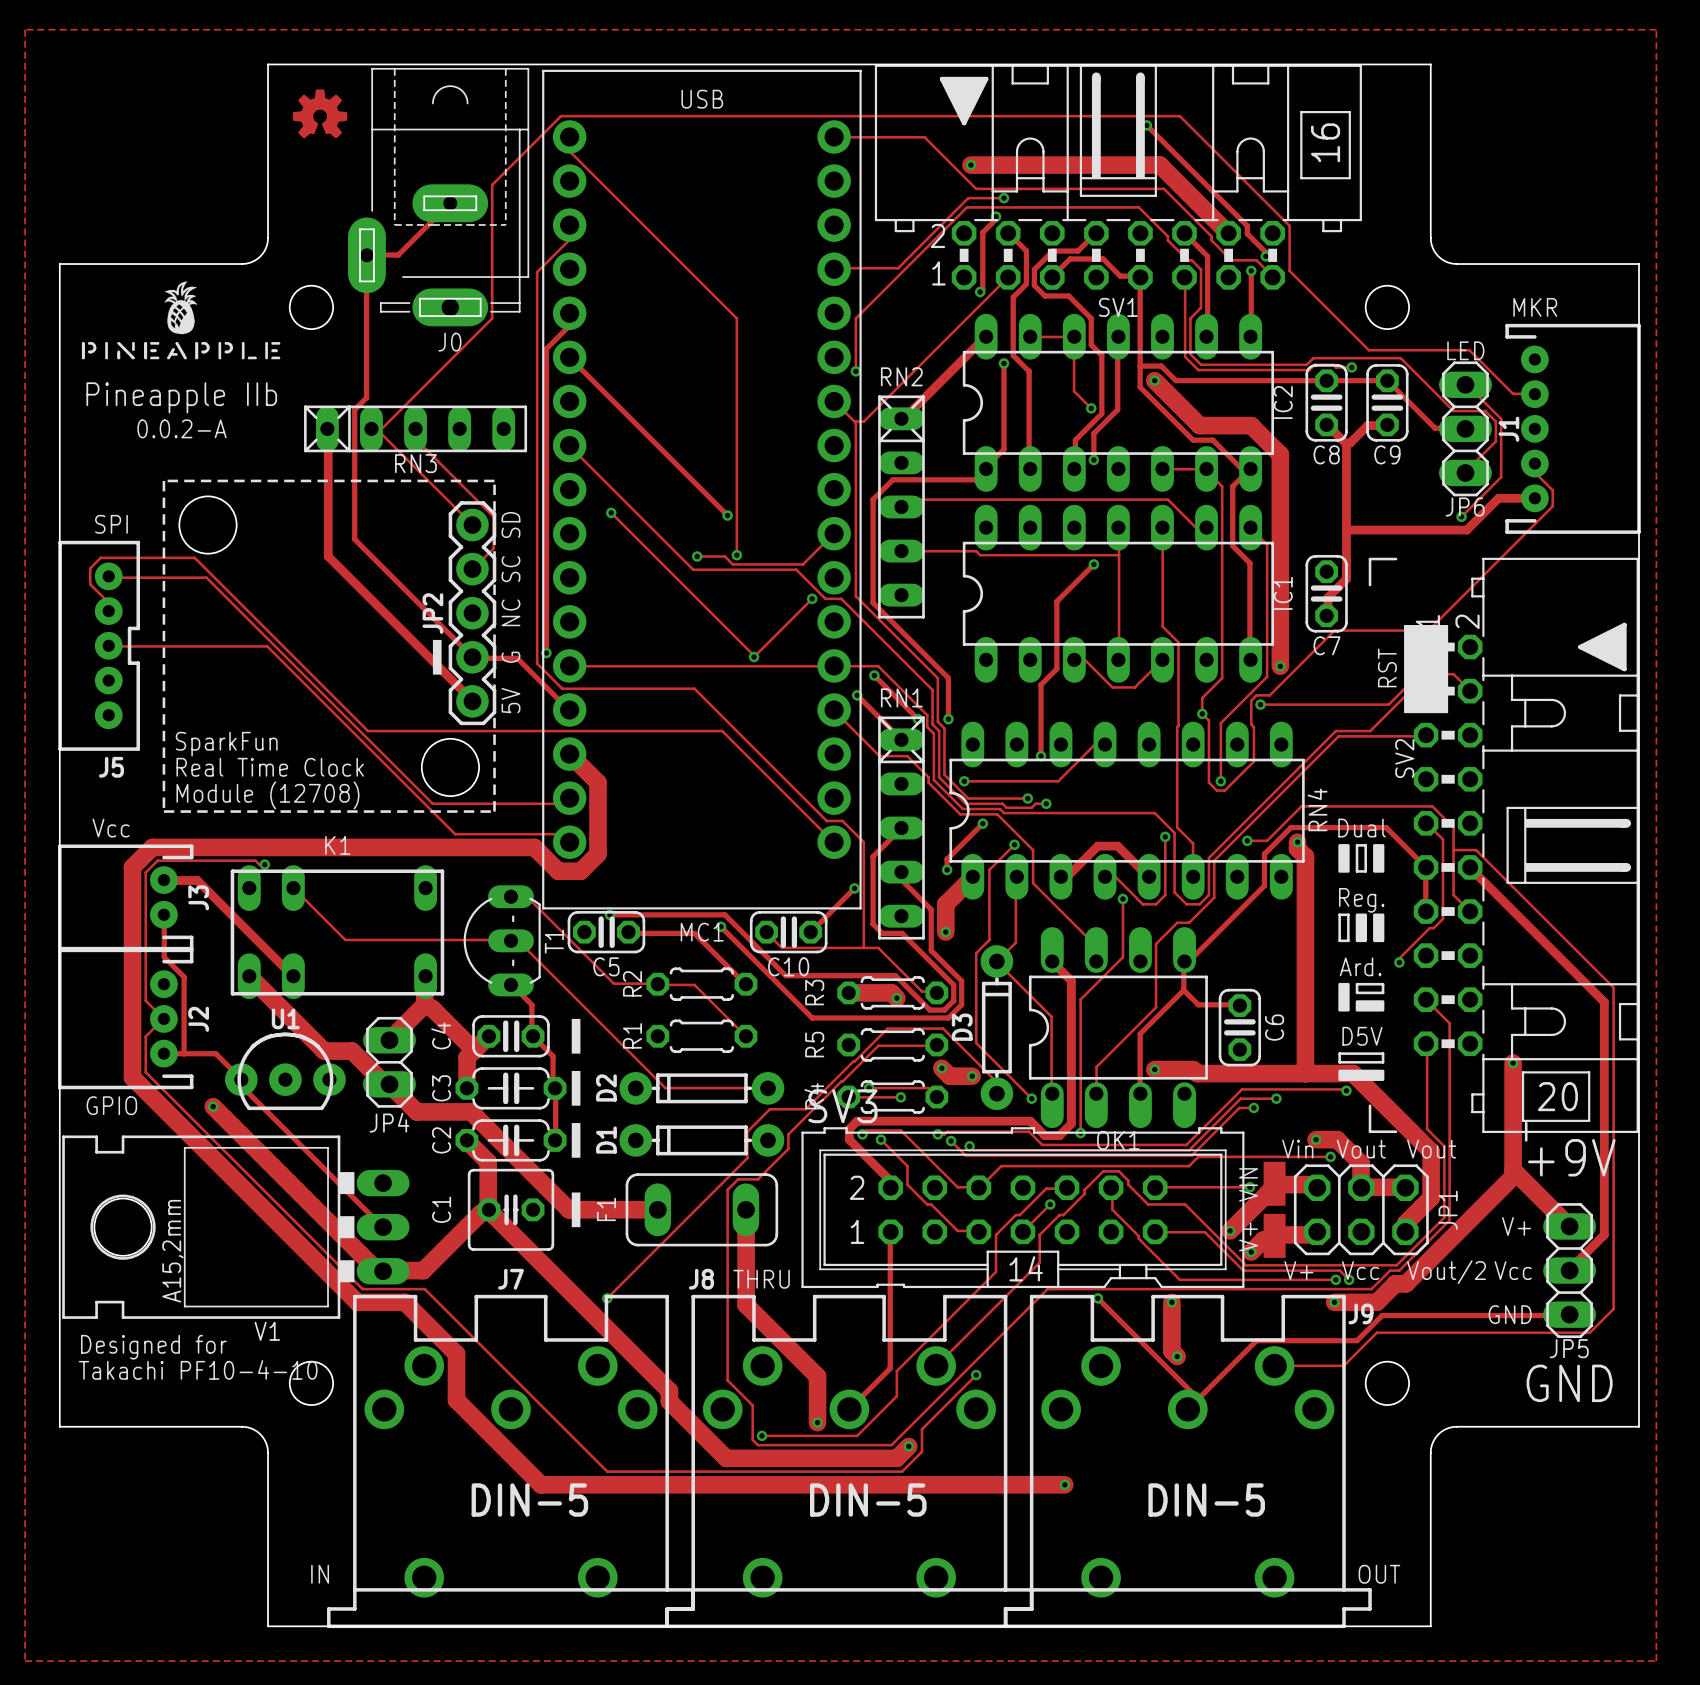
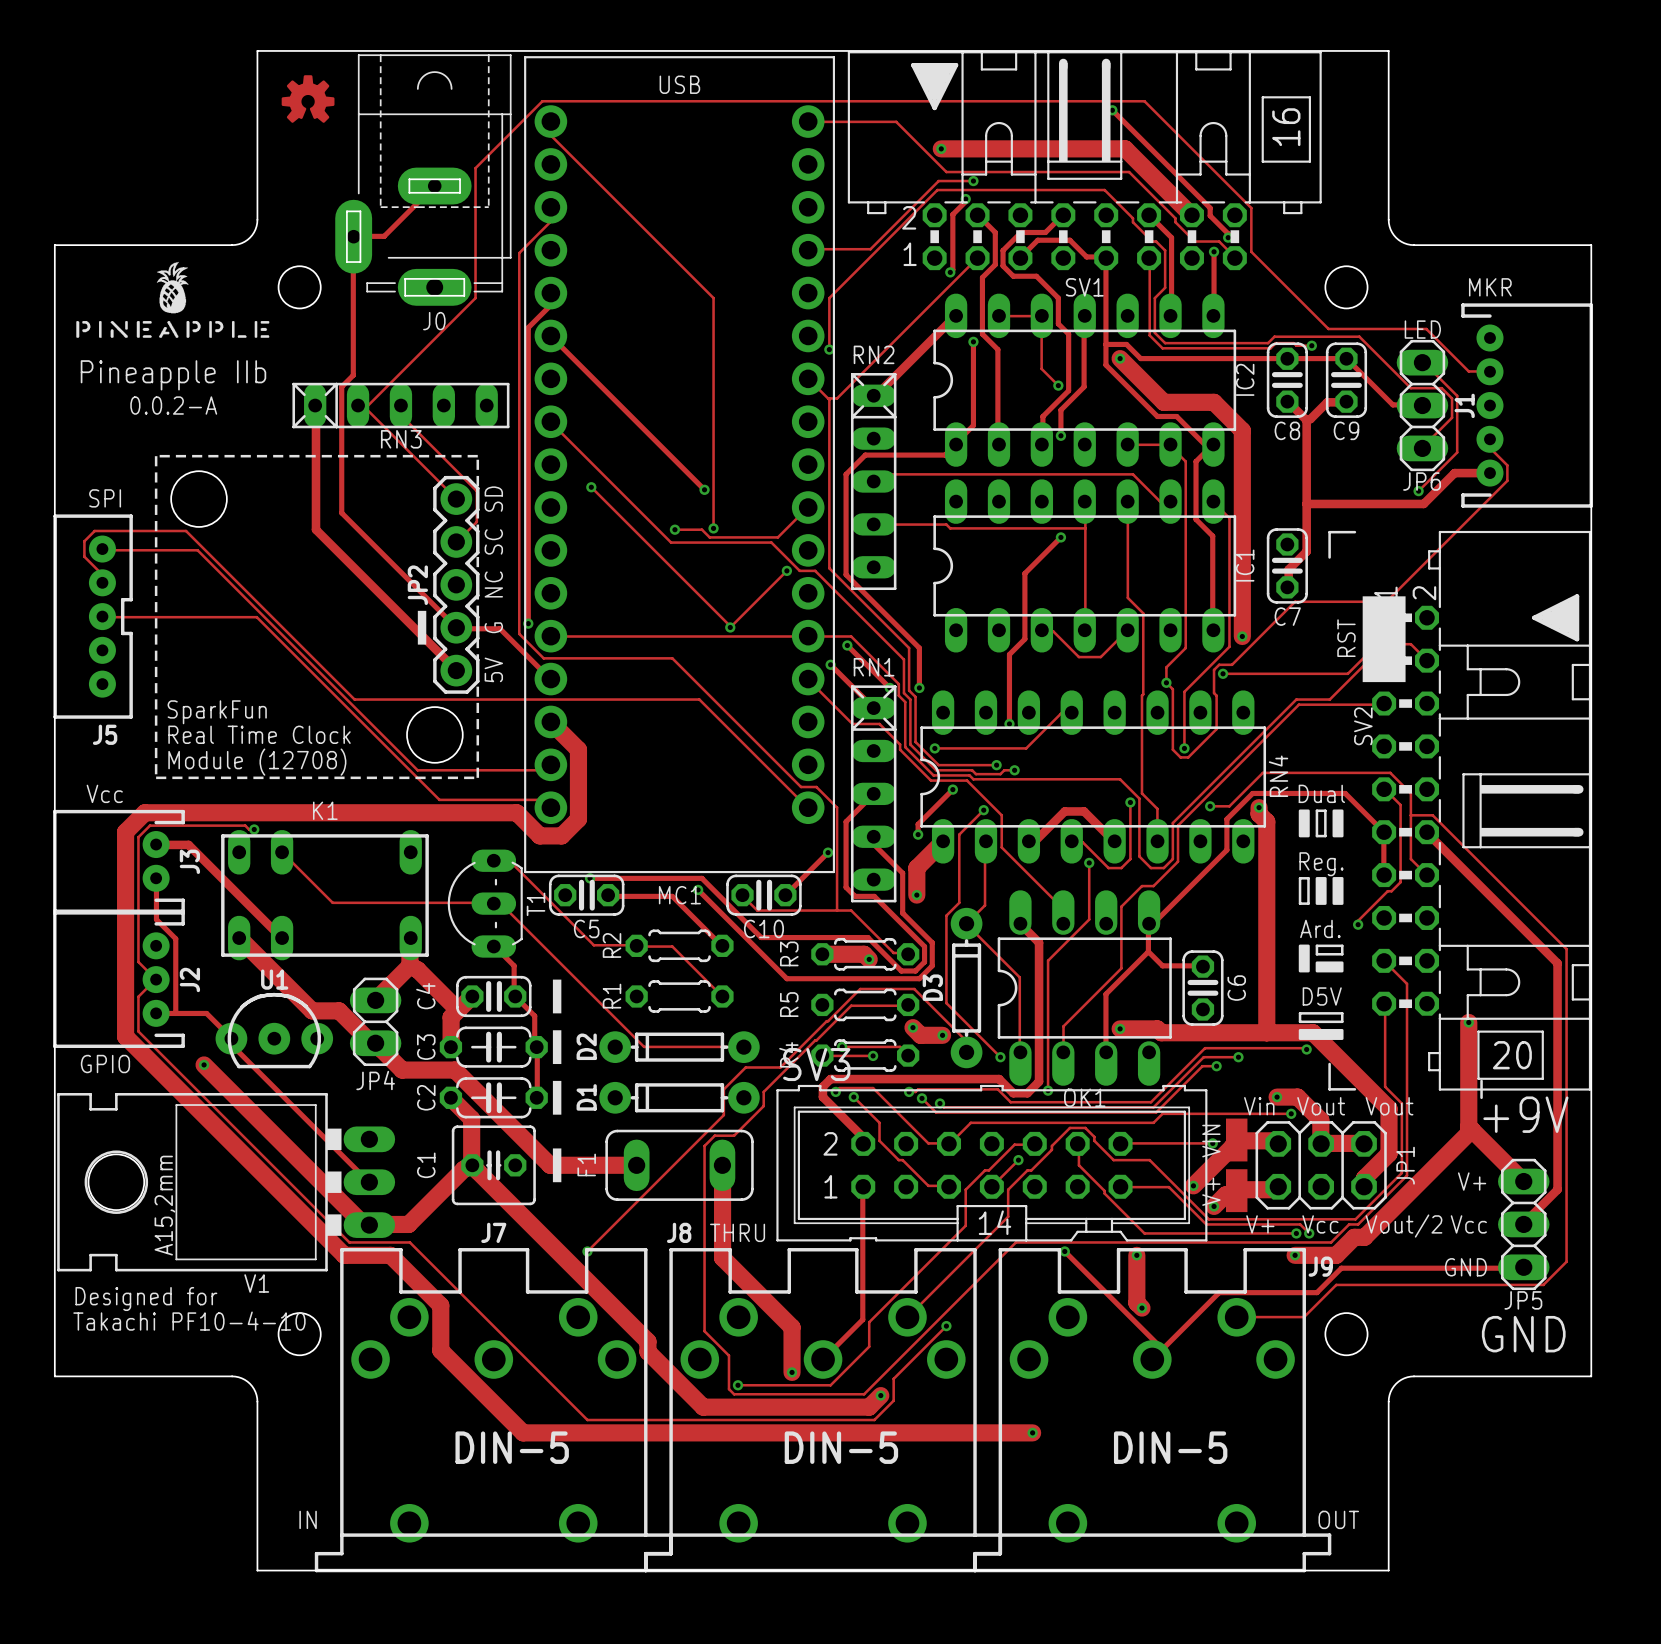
zone outline: (25, 29) (1656, 29) (1656, 1661) (25, 1661) (25, 29) -> none

